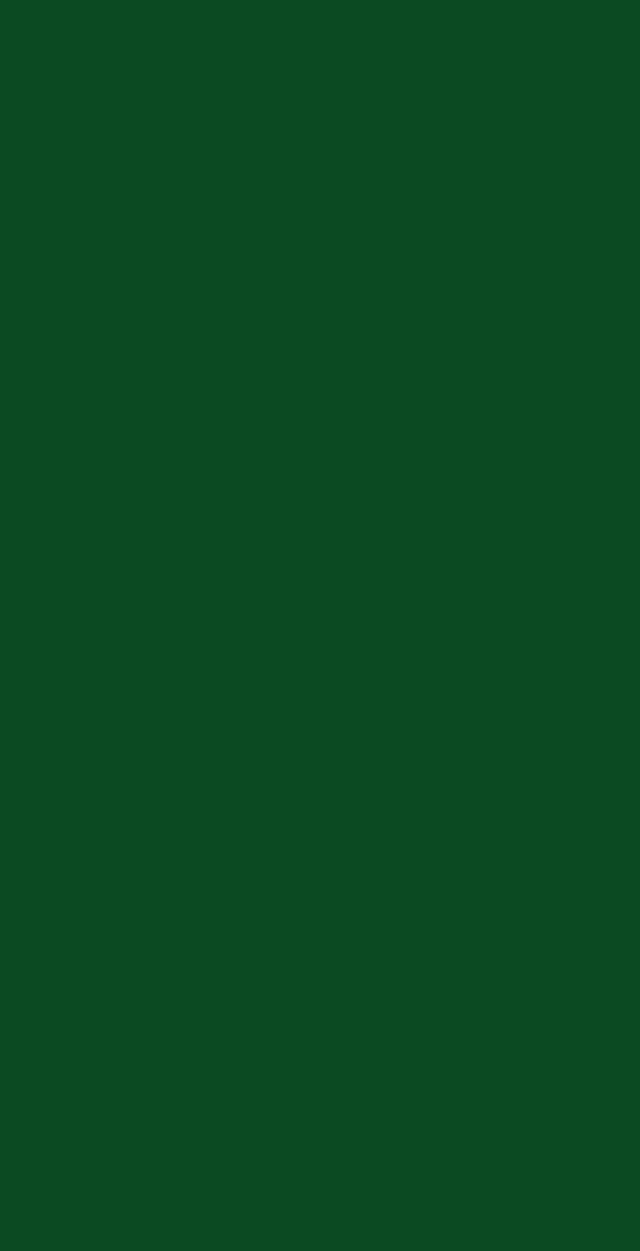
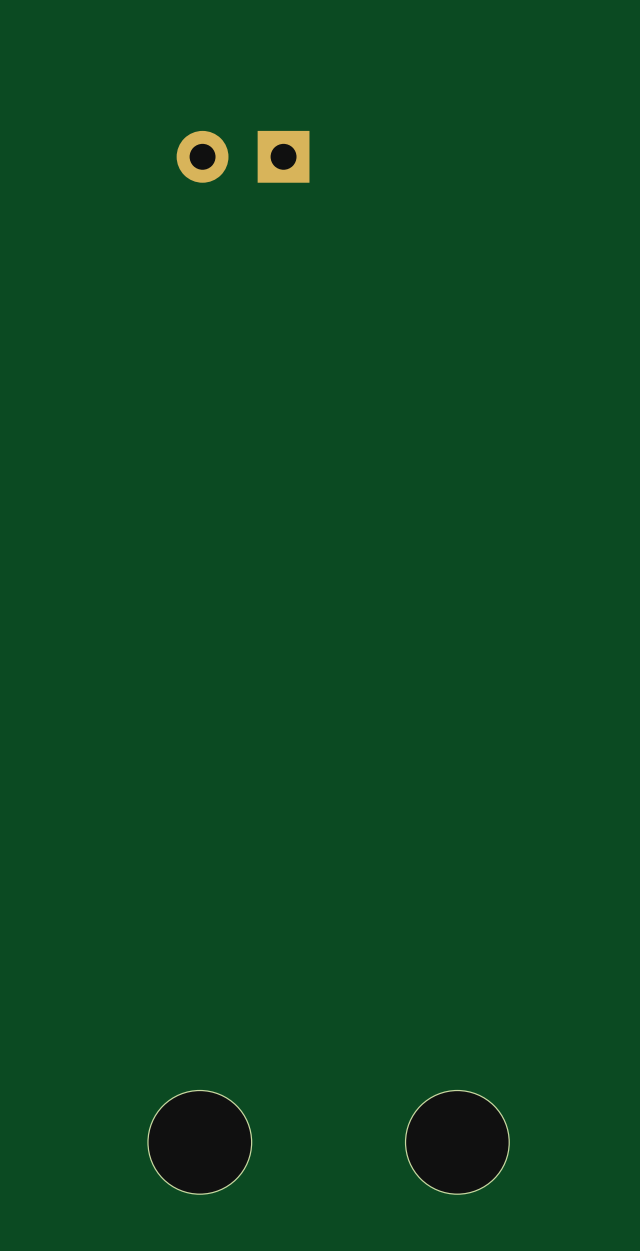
part: none -> (243, 156)
part: none -> (199, 1142)
part: none -> (457, 1142)

